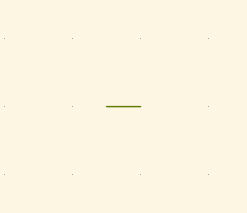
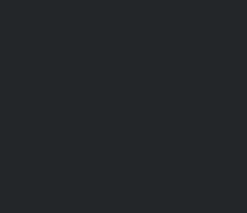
wire: (106, 106) (140, 106) -> none

